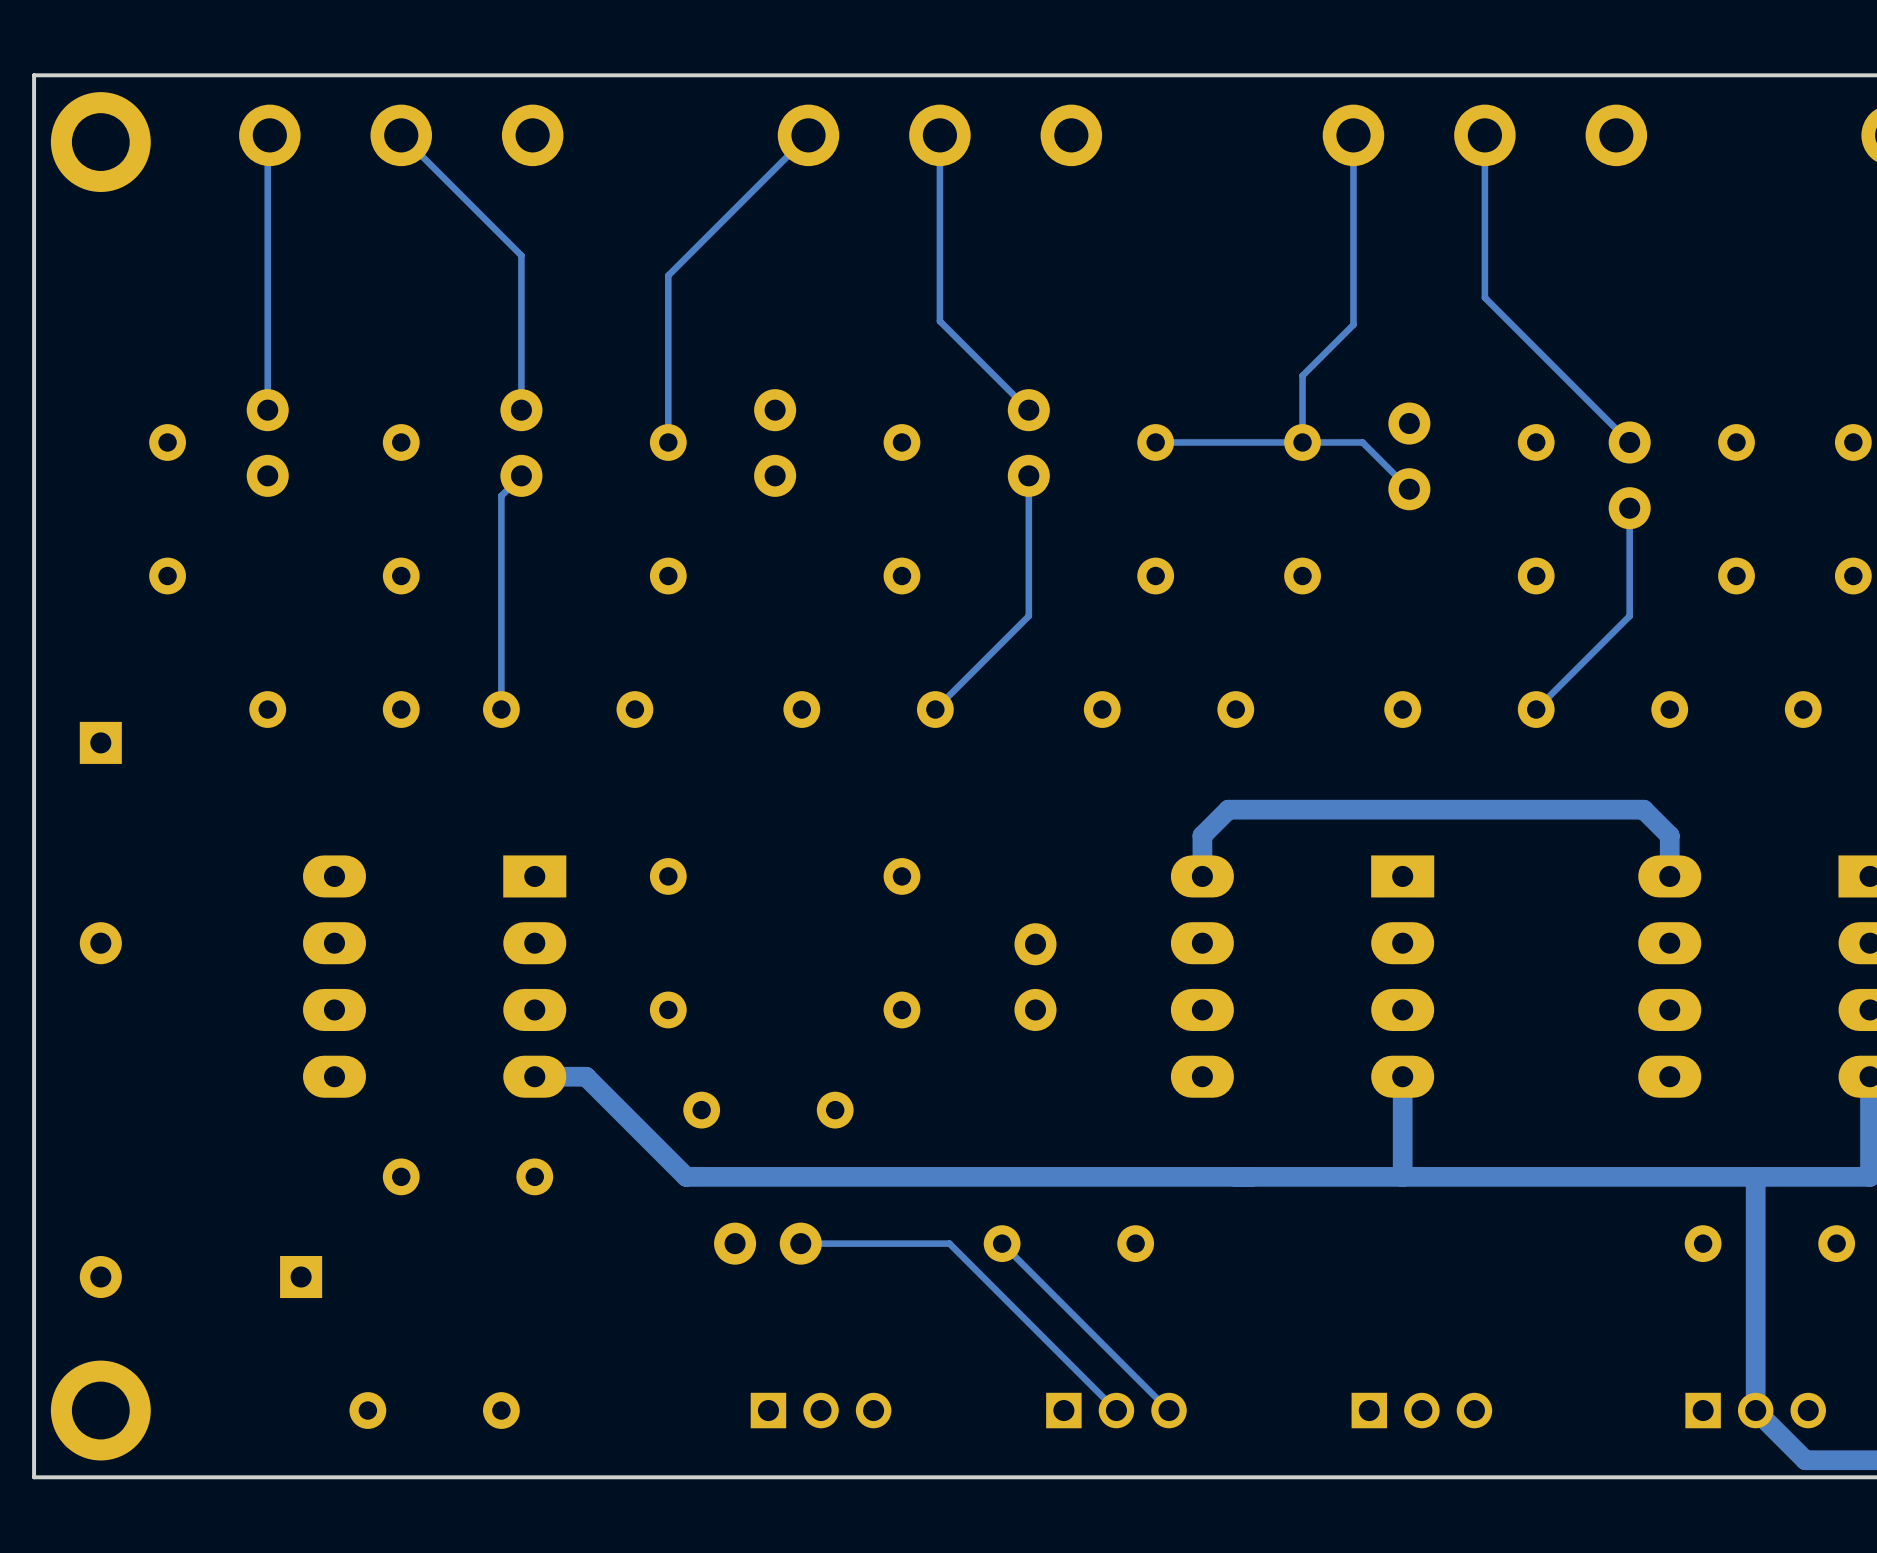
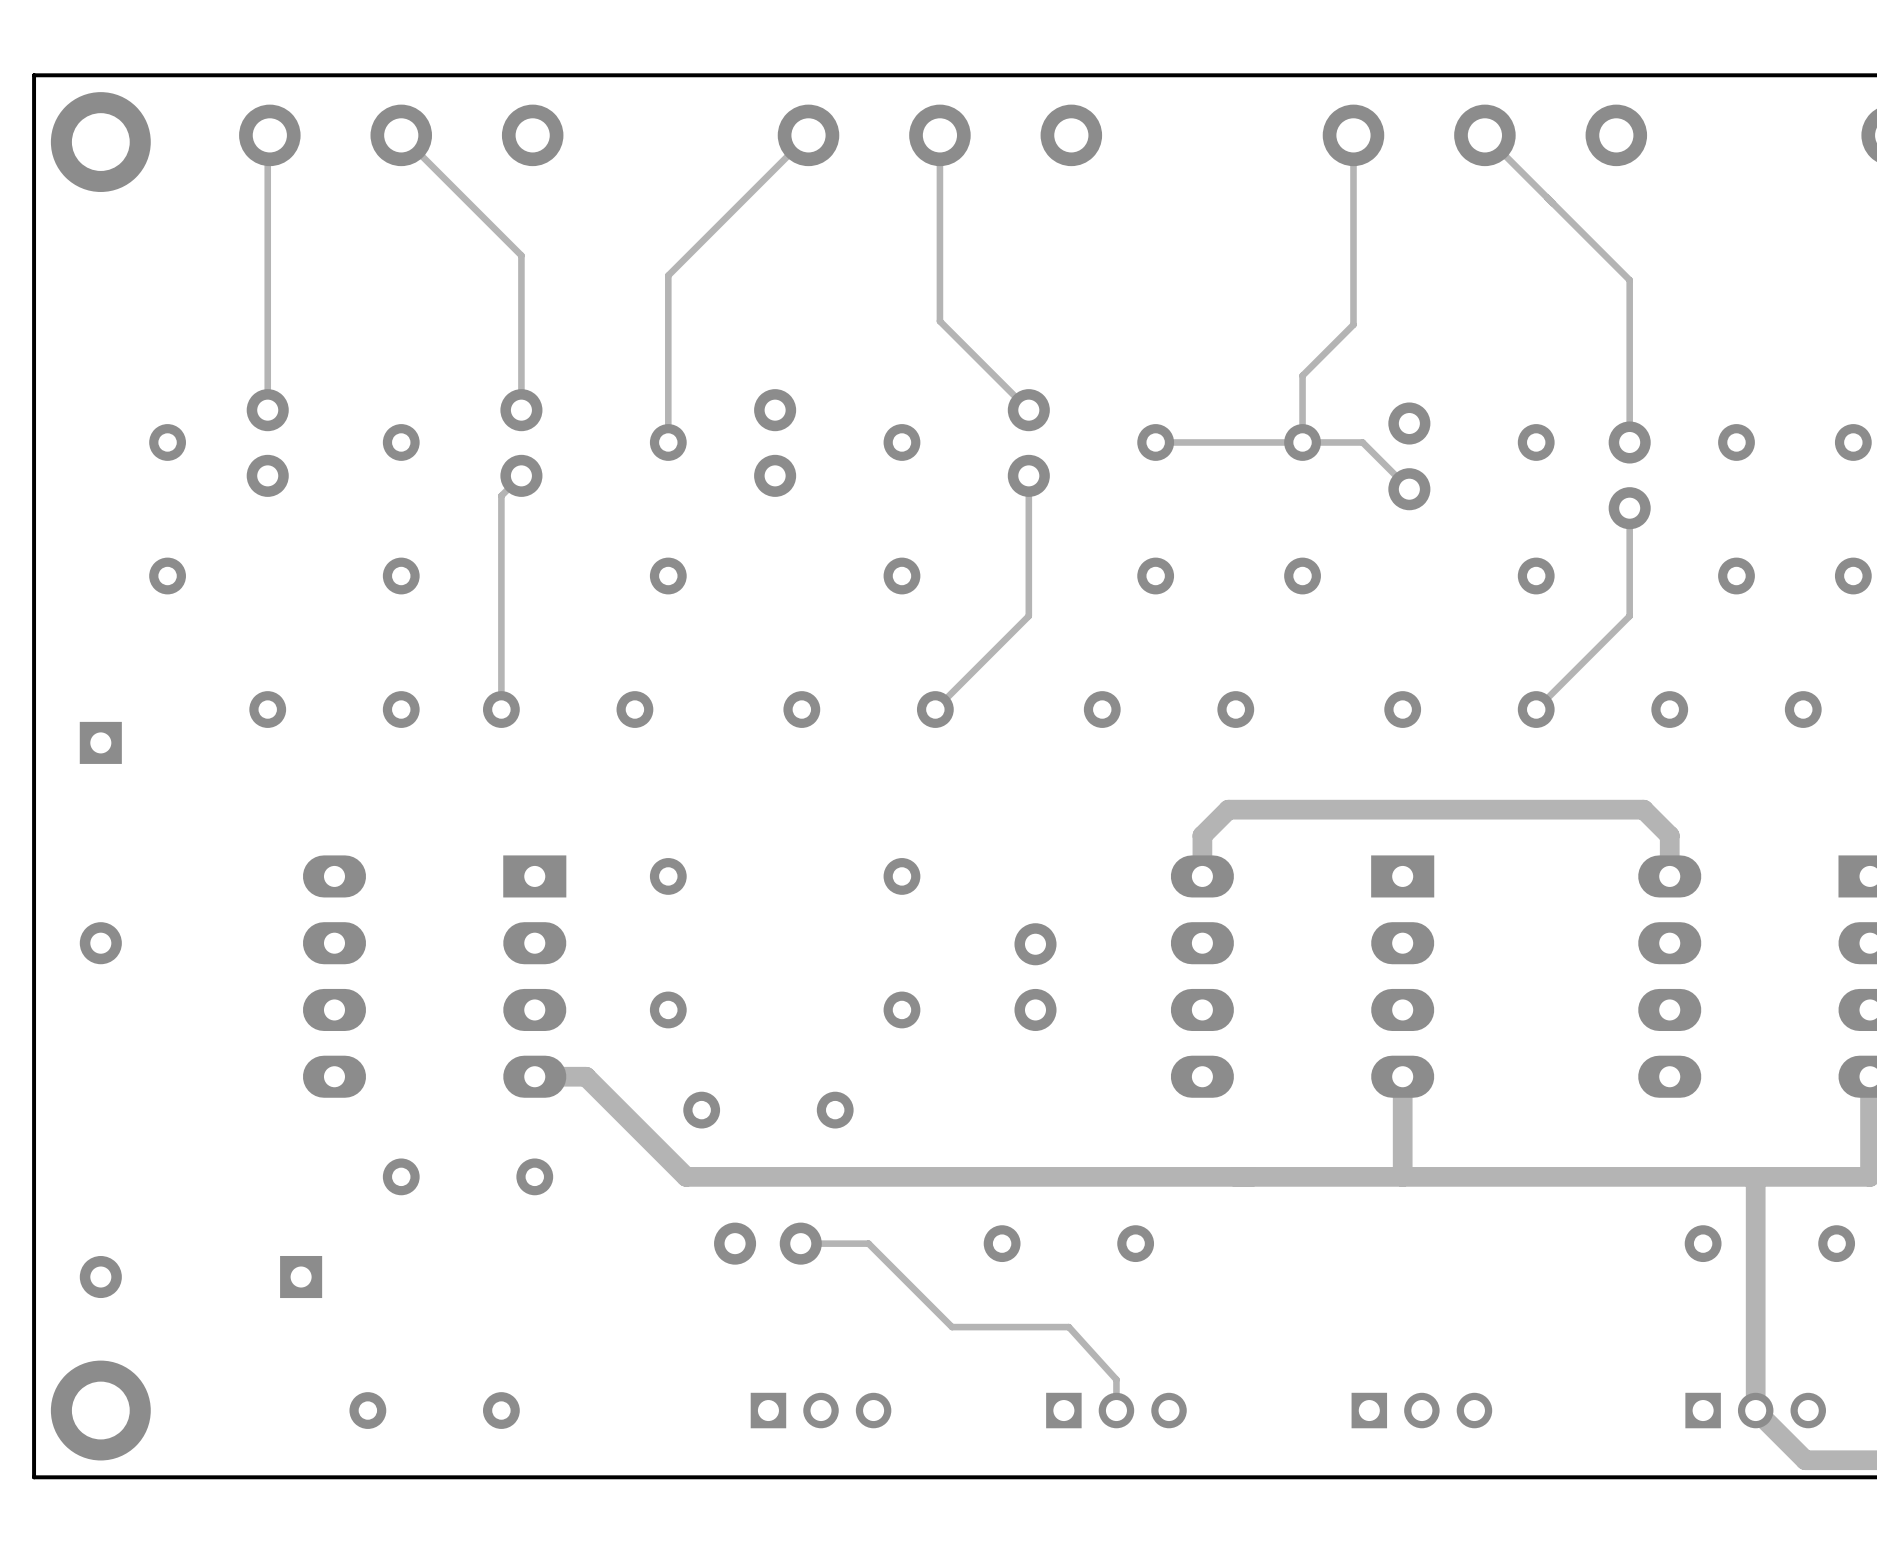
track: (1484, 135) (1484, 297) (1629, 442) -> (1484, 135) (1629, 280) (1629, 442)
track: (868, 1243) (949, 1243) (1116, 1410) -> (868, 1243) (952, 1327) (1068, 1327) (1116, 1379) (1116, 1410)
track: (1002, 1243) (1169, 1410) -> none

